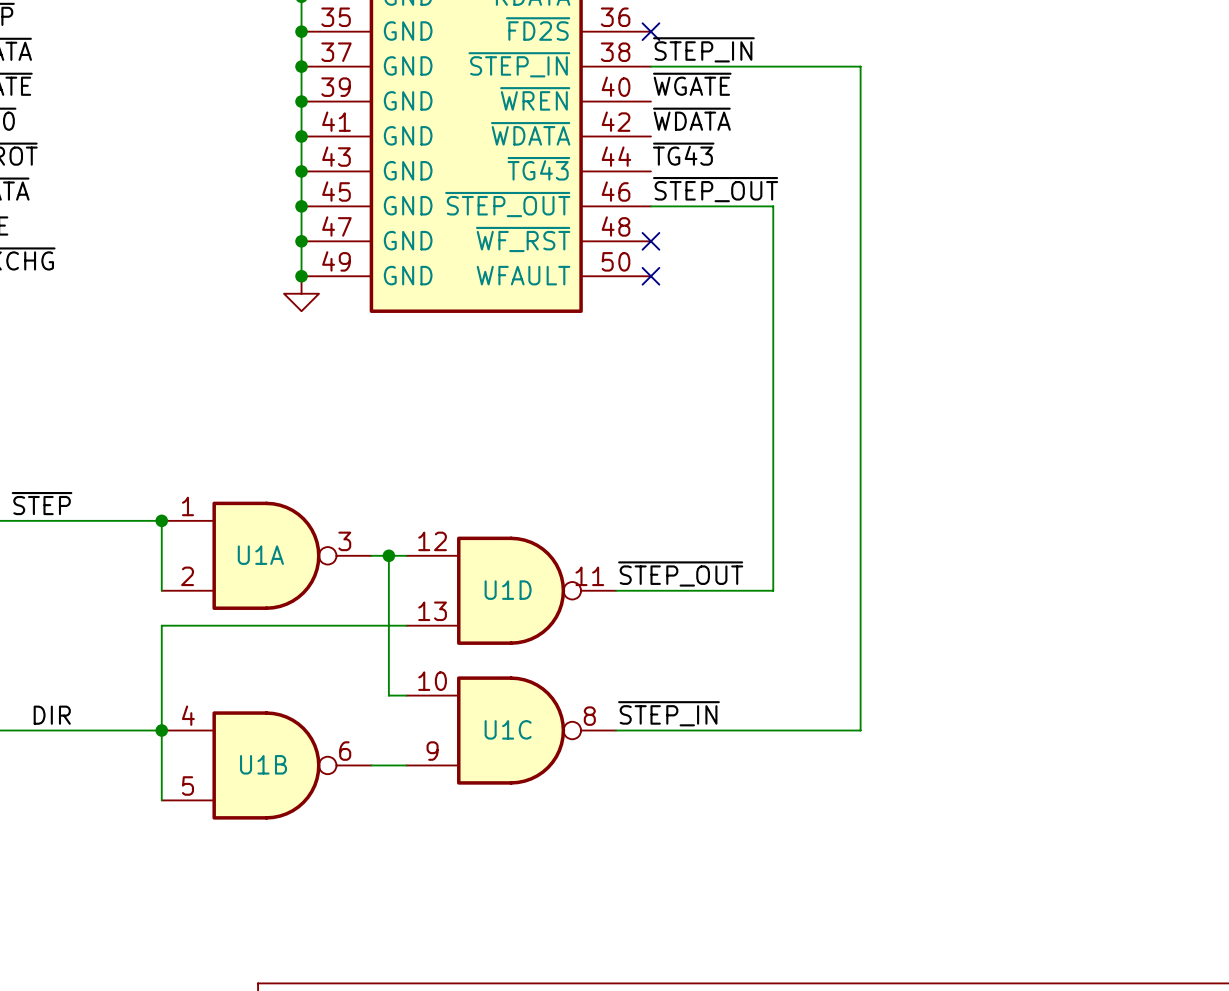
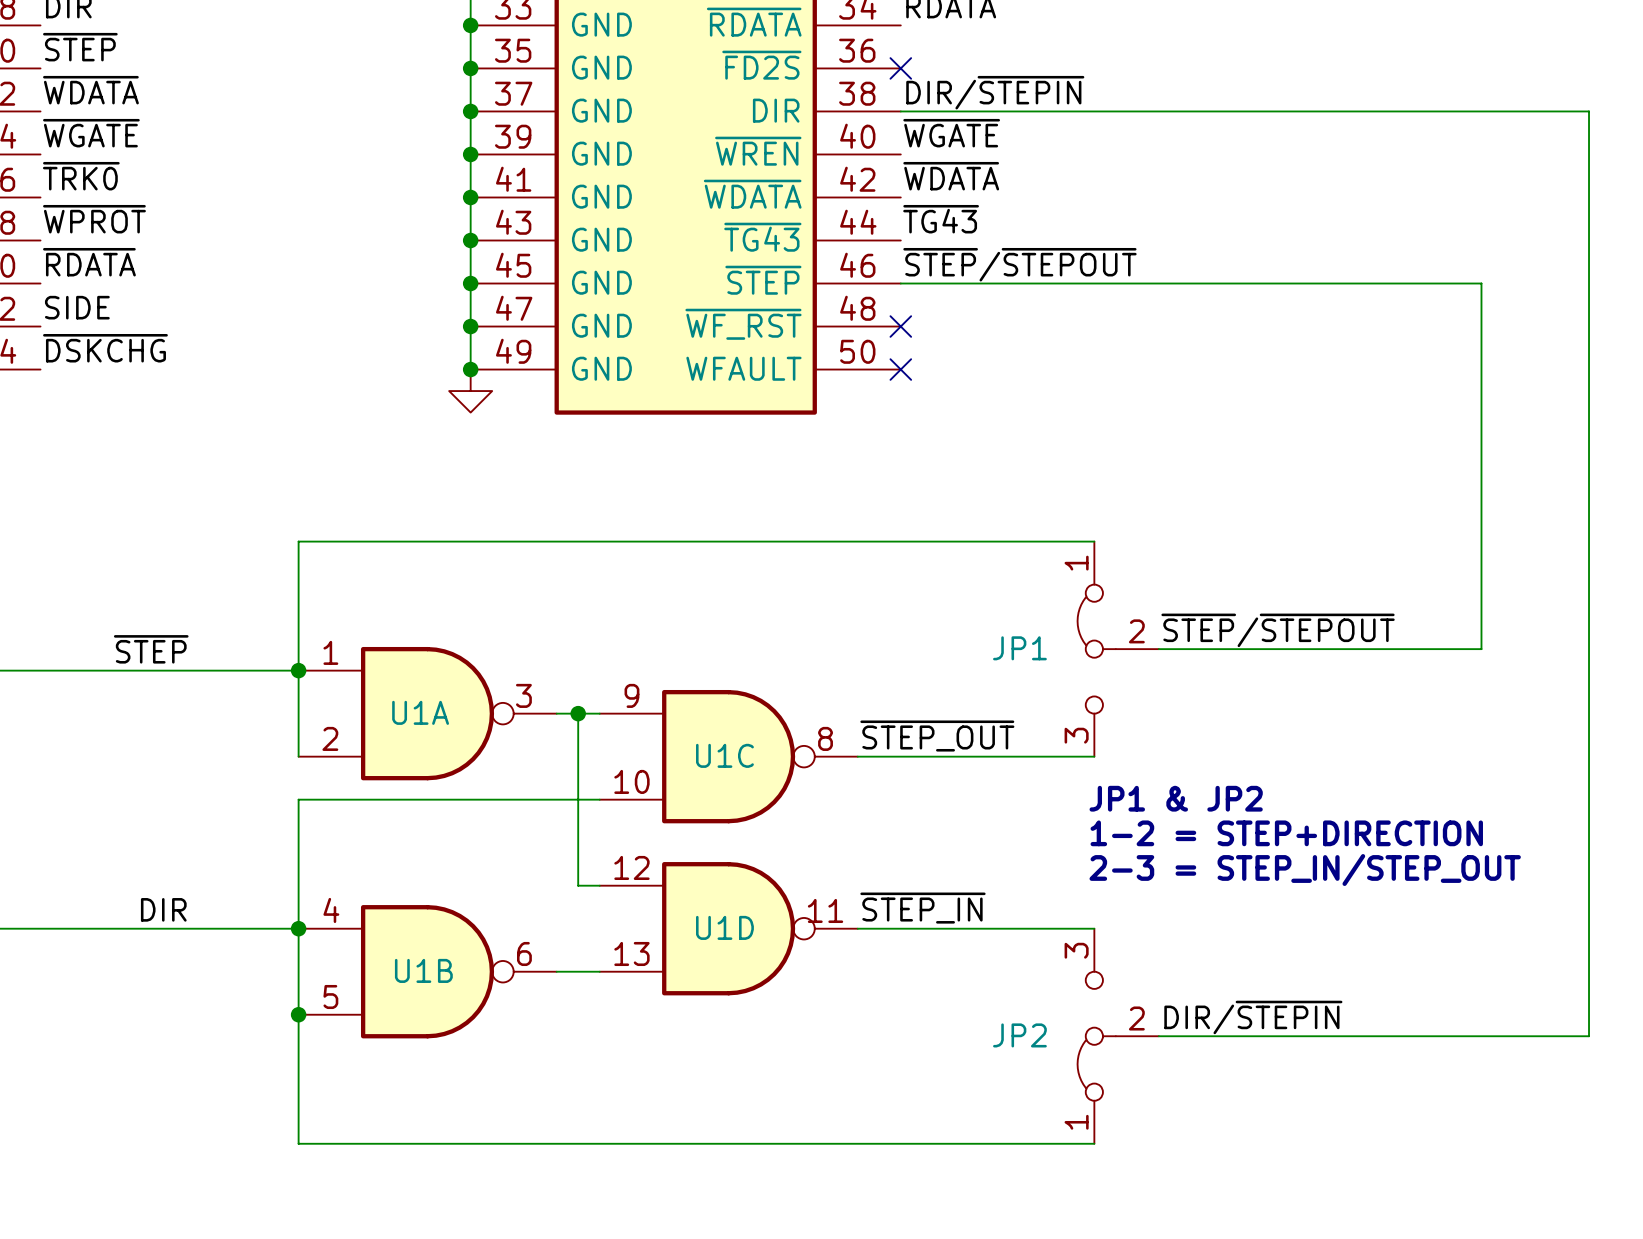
label: ~{STEP_IN} (703, 49) -> DIR/~{STEPIN} (995, 92)
part pin name: ~{STEP_IN} (519, 64) -> DIR (776, 110)
wire: (860, 66) (860, 730) (808, 730) -> (1158, 111) (1589, 111) (1589, 1036) (1158, 1036)
label: ~{STEP_OUT} (715, 189) -> ~{STEP}/~{STEPOUT} (1019, 264)
part pin name: ~{STEP_OUT} (507, 204) -> ~{STEP} (763, 280)
wire: (773, 206) (773, 590) -> (1051, 283) (1481, 283) (1481, 649) (1158, 649)
wire: none -> (1094, 541) (298, 541) (298, 670)
label: none -> ~{STEP}/~{STEPOUT} (1278, 630)
JP1: none -> (1118, 649)
U1D position: (511, 590) -> (728, 928)
wire: none -> (1051, 756) (1094, 756)
text: none -> JP1 & JP2 (1176, 798)
text: none -> 1-2 = STEP+DIRECTION (1286, 833)
text: none -> 2-3 = STEP_IN/STEP_OUT (1305, 870)
U1C flip: as is (511, 730) -> up-down (728, 756)
U1C position: (511, 730) -> (728, 756)
wire: none -> (298, 1014) (298, 1143) (1094, 1143)
junction: none -> (298, 1014)
label: none -> DIR/~{STEPIN} (1253, 1017)
JP2: none -> (1118, 1036)

